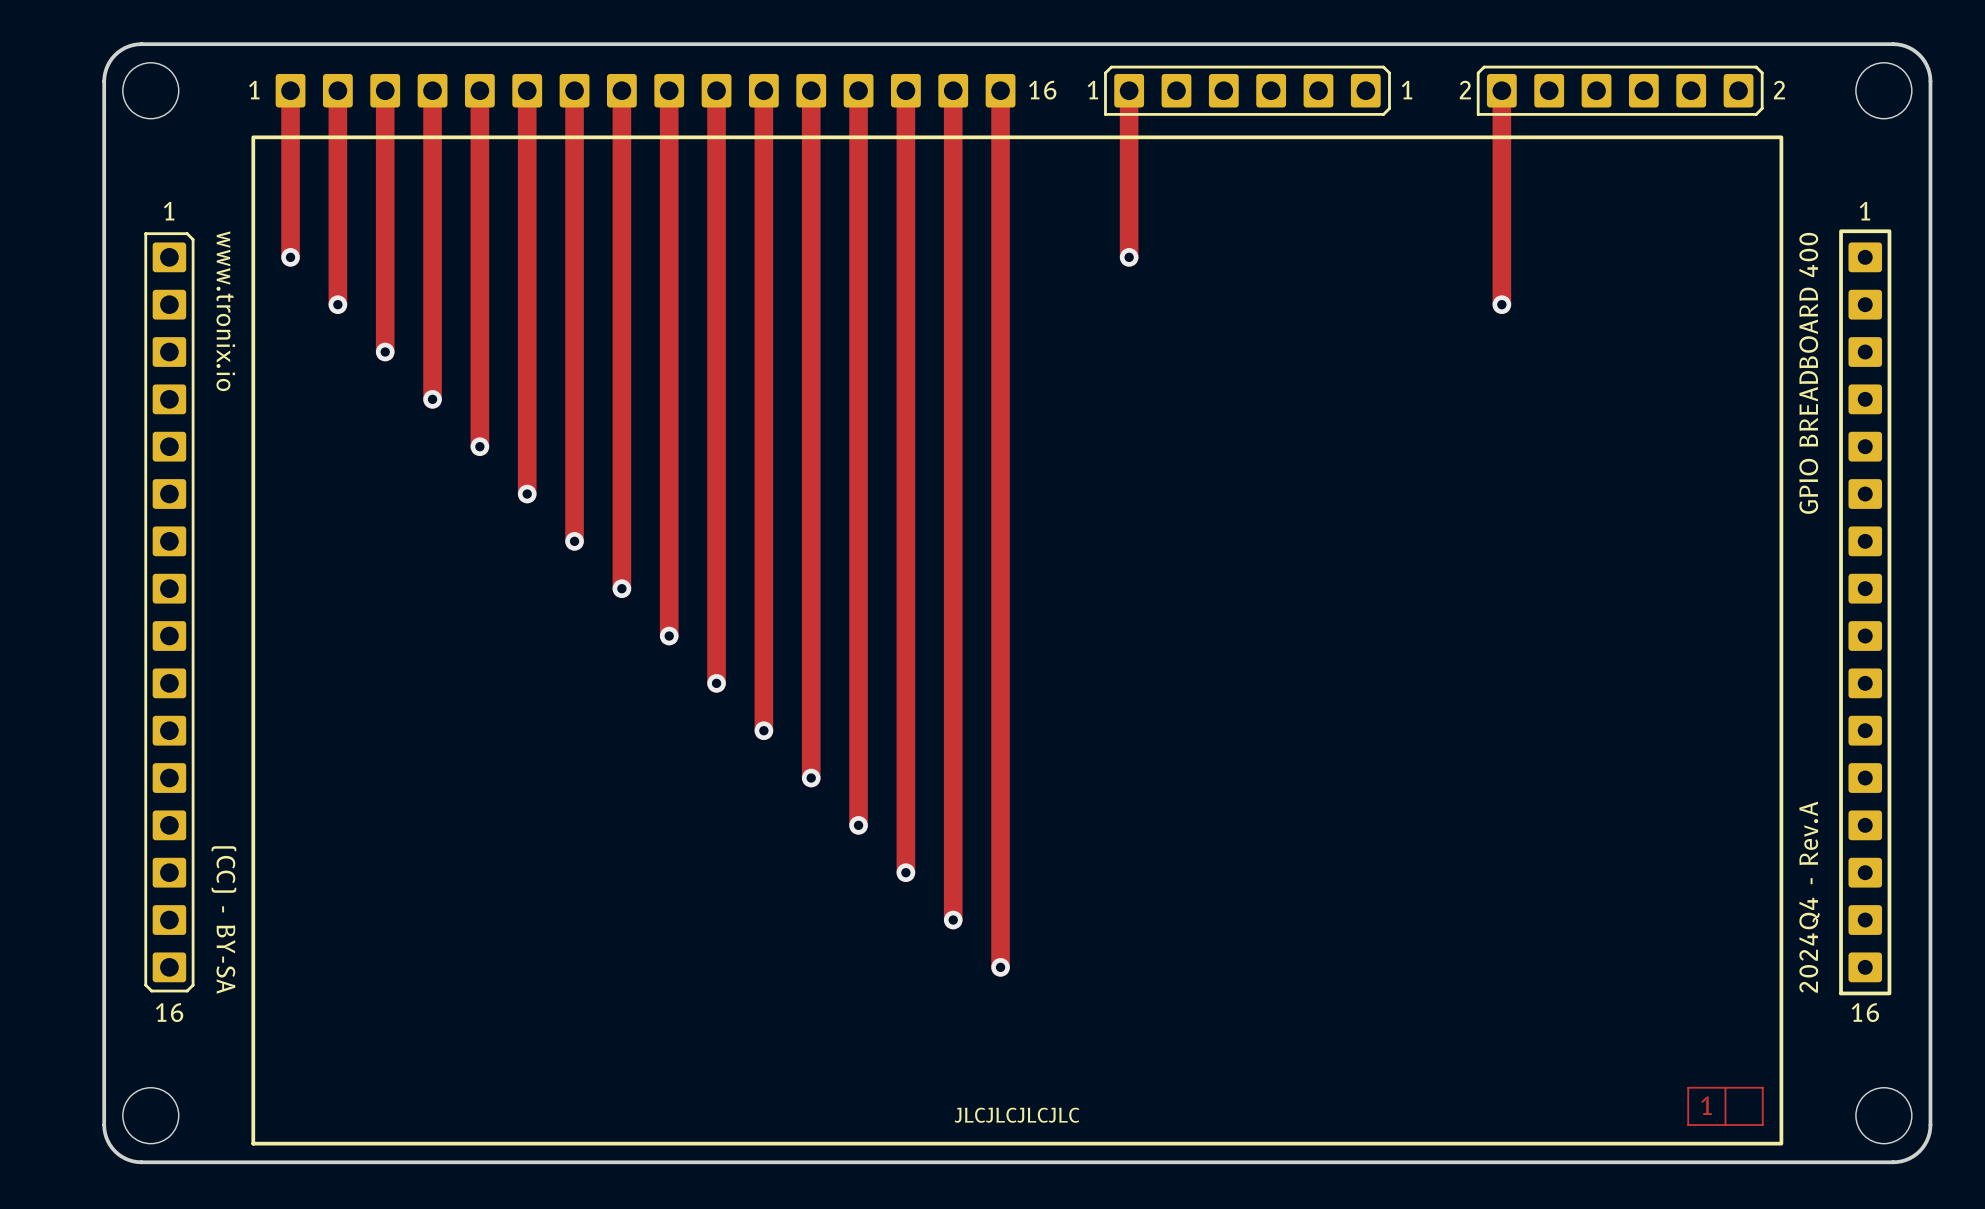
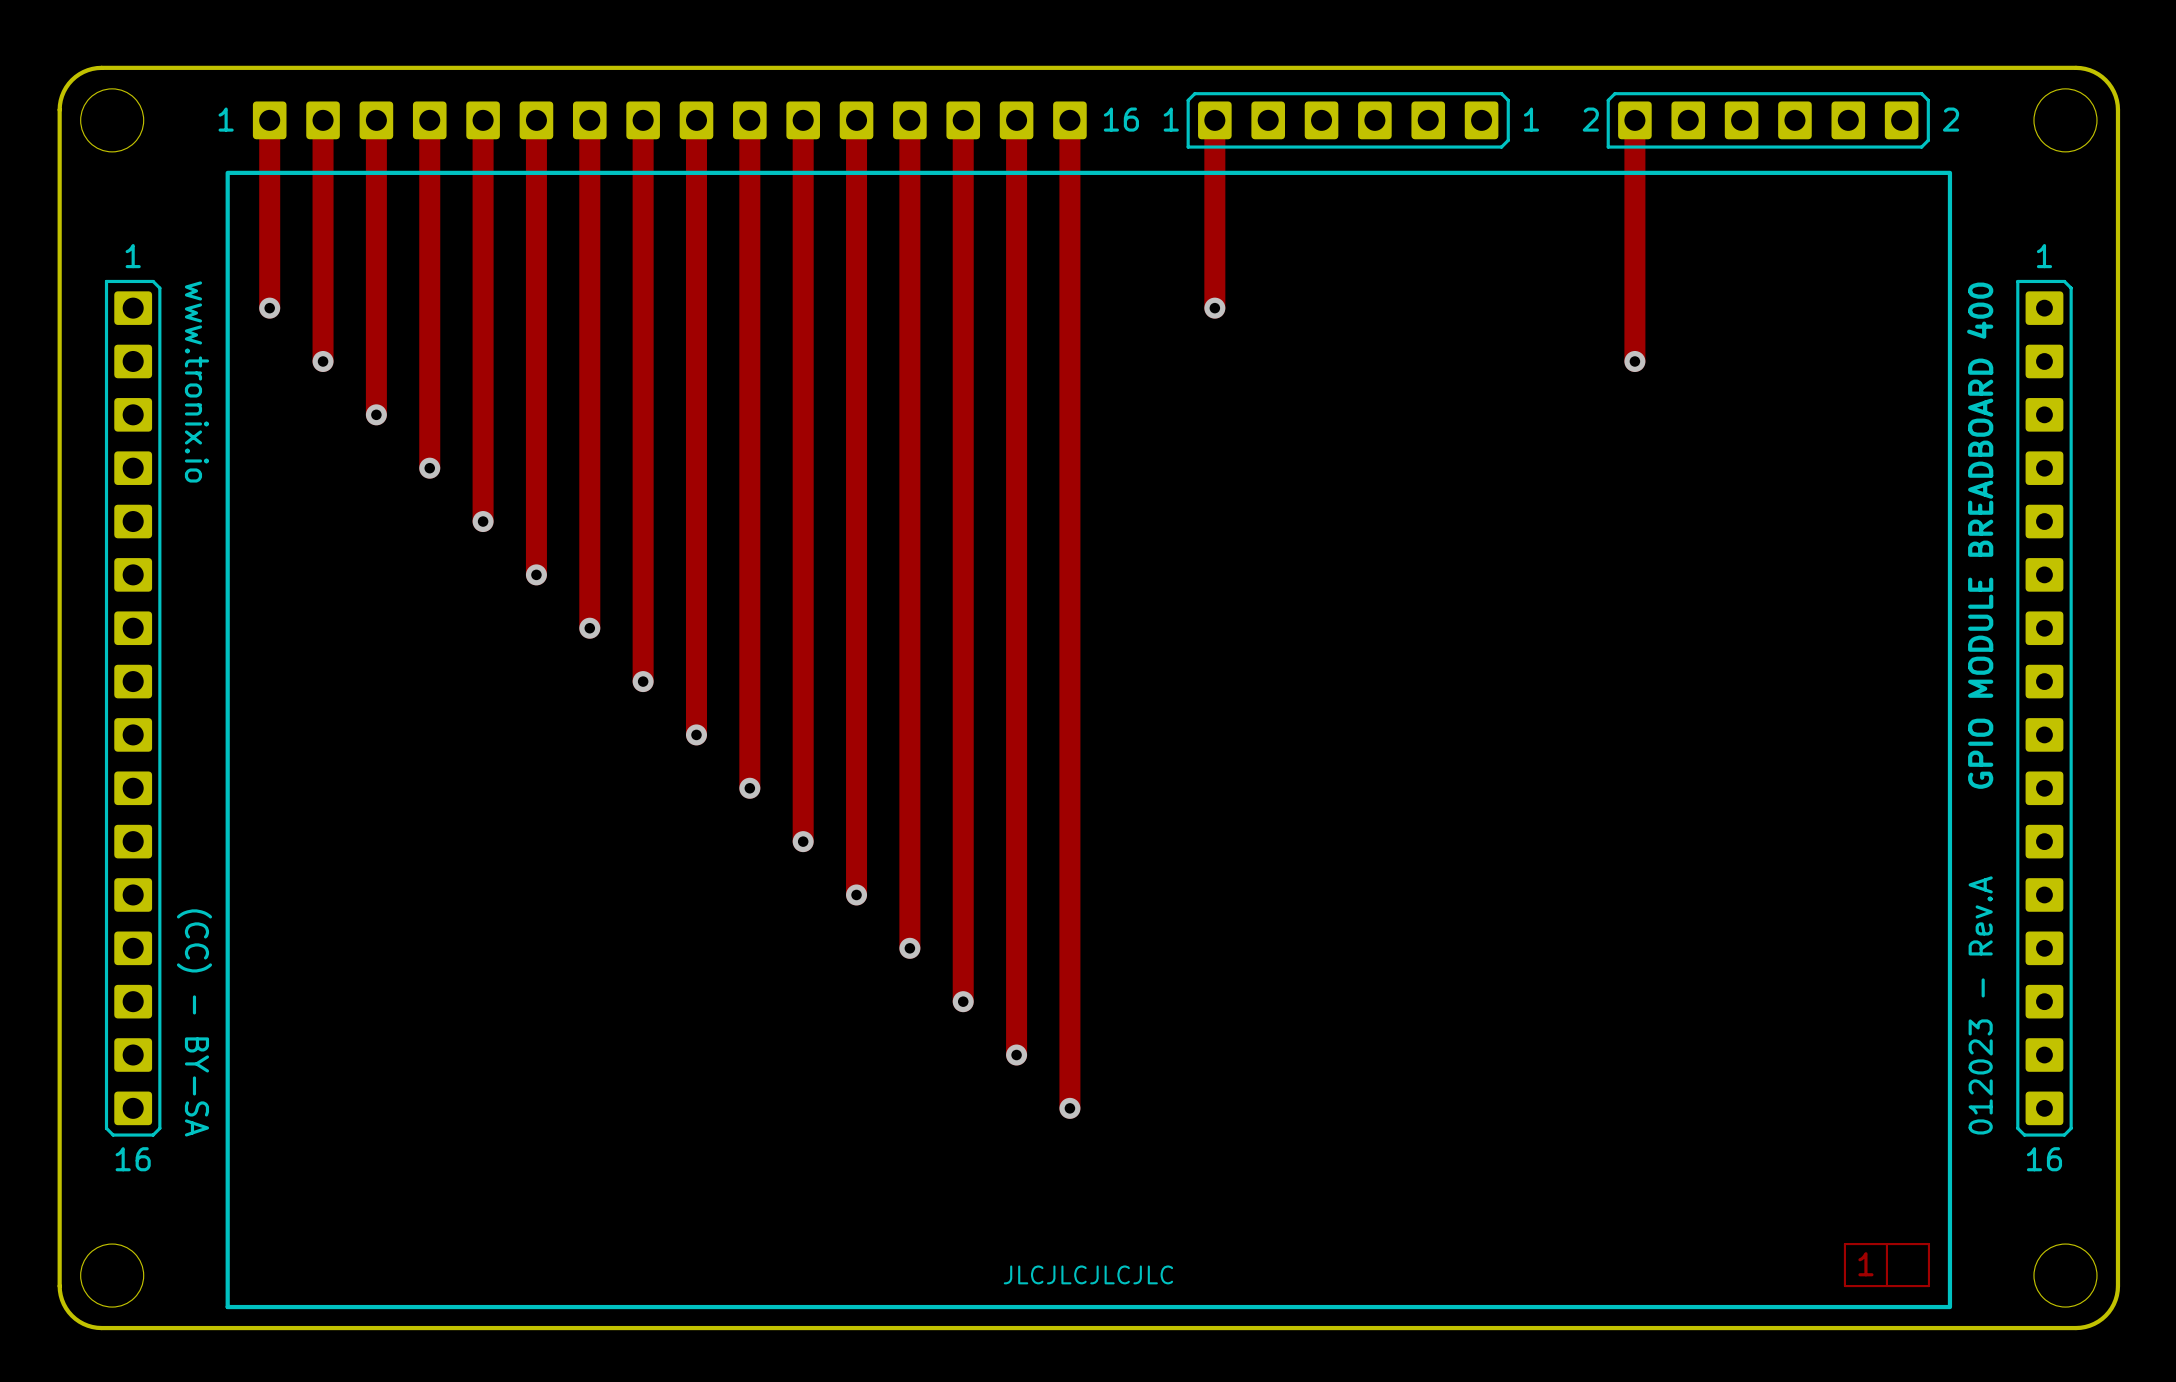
part footprint: [1839, 229, 1892, 996] -> [2016, 279, 2073, 1137]
text: GPIO BREADBOARD 400 (1808, 373) -> GPIO MODULE BREADBOARD 400 (1980, 535)
text: 2024Q4 - Rev.A (1809, 897) -> 012023 - Rev.A (1980, 1005)

